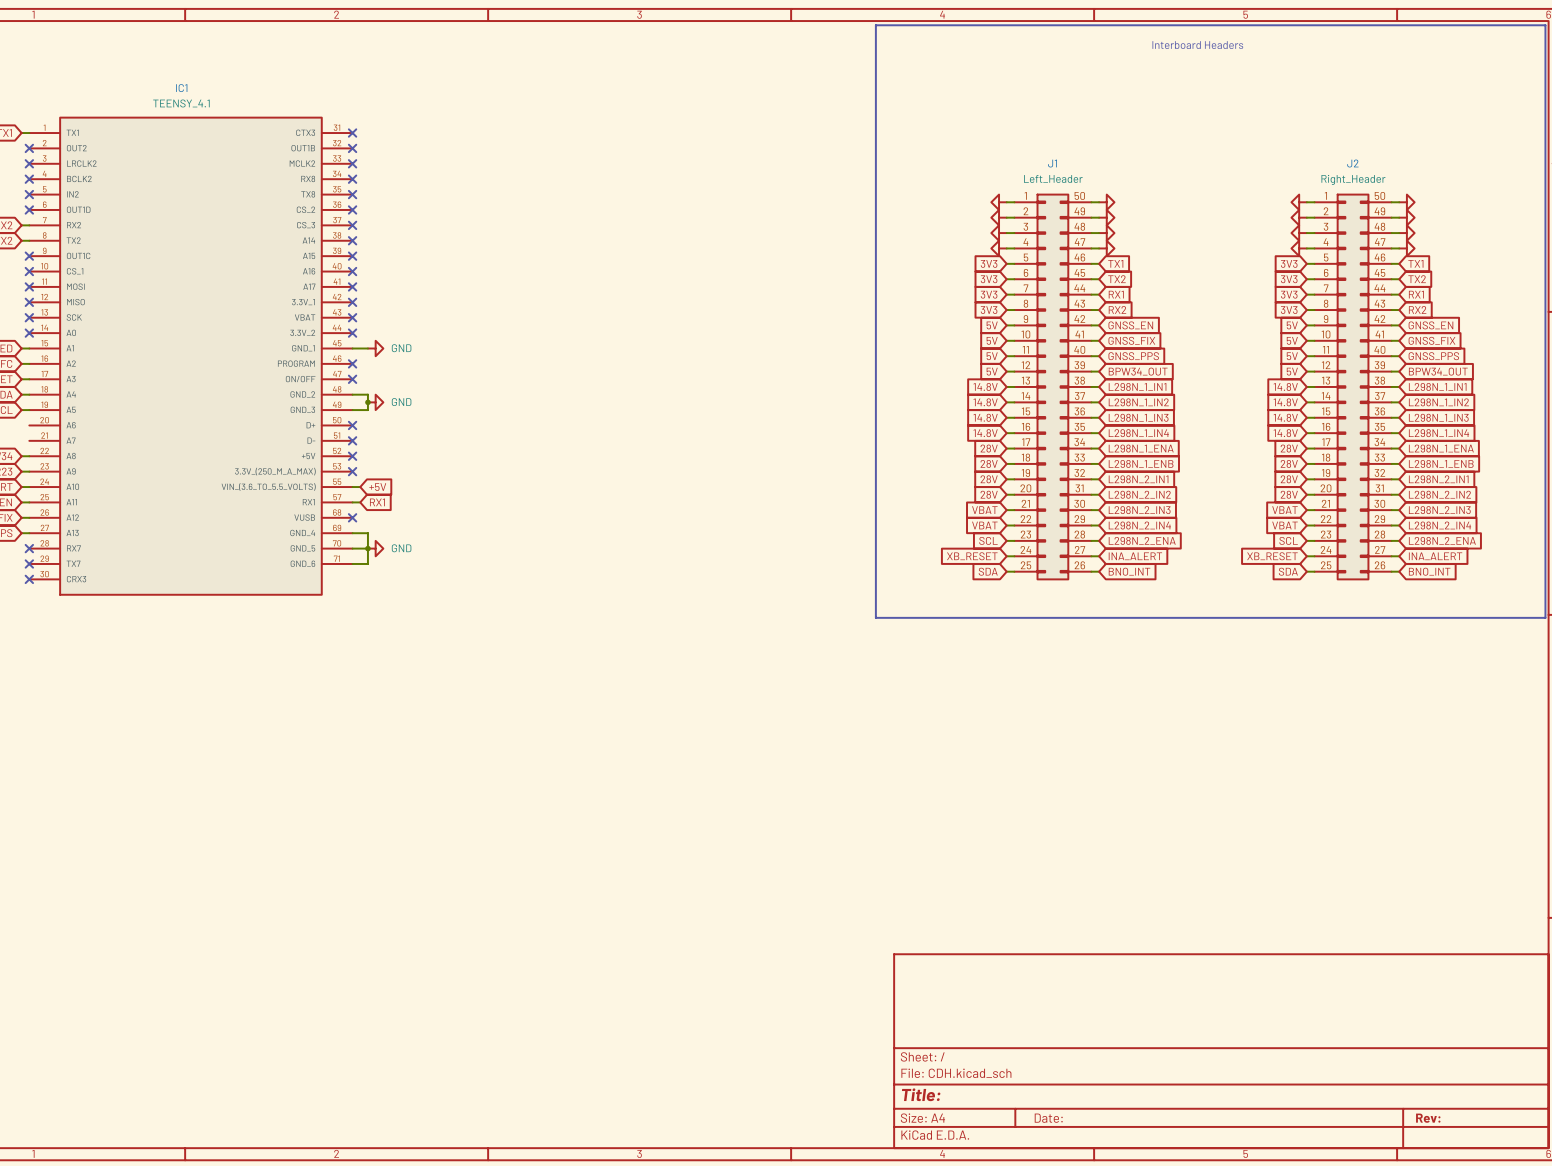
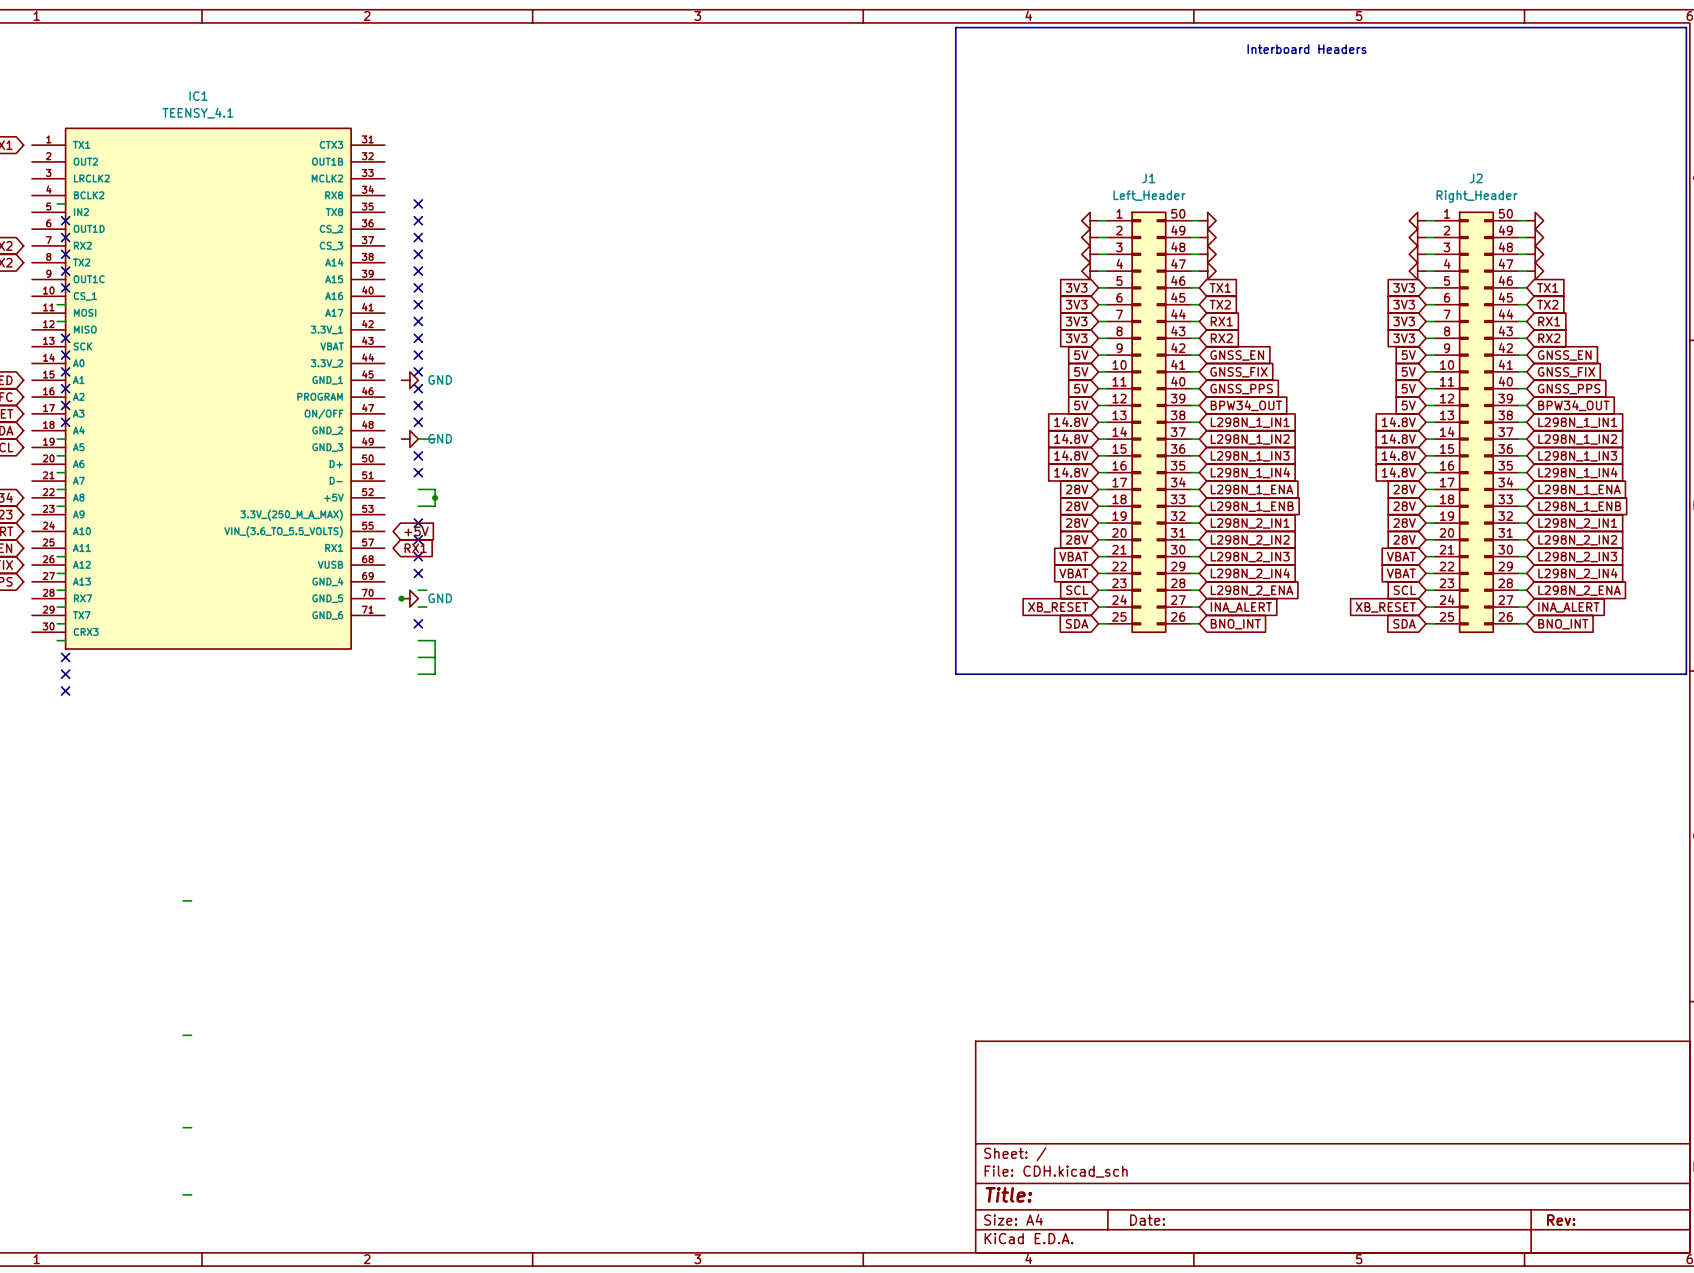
wire: (21, 133) (29, 133) -> (57, 203) (65, 203)
no-connect mark: (352, 133) -> none
no-connect mark: (29, 148) -> none
no-connect mark: (352, 148) -> none
no-connect mark: (29, 163) -> none
no-connect mark: (352, 163) -> none
no-connect mark: (29, 179) -> none
no-connect mark: (352, 179) -> none
no-connect mark: none -> (418, 203)
no-connect mark: (29, 194) -> none
no-connect mark: (352, 194) -> none
no-connect mark: none -> (65, 220)
no-connect mark: none -> (418, 220)
no-connect mark: (29, 209) -> none
no-connect mark: (352, 209) -> none
no-connect mark: none -> (65, 237)
no-connect mark: none -> (418, 237)
wire: (21, 225) (29, 225) -> (57, 304) (65, 304)
no-connect mark: (352, 225) -> none
no-connect mark: none -> (65, 254)
no-connect mark: none -> (418, 254)
wire: (21, 240) (29, 240) -> (57, 321) (65, 321)
no-connect mark: (352, 240) -> none
no-connect mark: none -> (65, 271)
no-connect mark: none -> (418, 271)
no-connect mark: (29, 256) -> none
no-connect mark: (352, 256) -> none
no-connect mark: none -> (65, 287)
no-connect mark: none -> (418, 287)
no-connect mark: (29, 271) -> none
no-connect mark: (352, 271) -> none
no-connect mark: none -> (418, 304)
no-connect mark: (29, 286) -> none
no-connect mark: (352, 286) -> none
no-connect mark: none -> (418, 321)
no-connect mark: (29, 302) -> none
no-connect mark: (352, 302) -> none
no-connect mark: none -> (65, 338)
no-connect mark: none -> (418, 338)
no-connect mark: (29, 317) -> none
no-connect mark: (352, 317) -> none
no-connect mark: none -> (65, 355)
no-connect mark: none -> (418, 355)
no-connect mark: (29, 333) -> none
no-connect mark: (352, 333) -> none
no-connect mark: none -> (65, 371)
no-connect mark: none -> (418, 371)
wire: (21, 348) (29, 348) -> (57, 439) (65, 439)
wire: (352, 348) (367, 348) -> (418, 439) (435, 439)
no-connect mark: none -> (65, 388)
no-connect mark: none -> (418, 388)
wire: (21, 363) (29, 363) -> (57, 455) (65, 455)
no-connect mark: (352, 363) -> none
no-connect mark: none -> (65, 405)
no-connect mark: none -> (418, 405)
wire: (21, 379) (29, 379) -> (57, 472) (65, 472)
no-connect mark: (352, 379) -> none
no-connect mark: none -> (65, 422)
no-connect mark: none -> (418, 422)
wire: (21, 394) (29, 394) -> (57, 489) (65, 489)
wire: (352, 394) (367, 394) (367, 410) (352, 410) -> (418, 489) (435, 489) (435, 506) (418, 506)
junction: (367, 402) -> none
wire: (21, 410) (29, 410) -> (57, 506) (65, 506)
no-connect mark: none -> (418, 455)
no-connect mark: (352, 425) -> none
no-connect mark: none -> (418, 472)
no-connect mark: (352, 440) -> none
wire: (21, 456) (29, 456) -> (57, 556) (65, 556)
no-connect mark: (352, 456) -> none
junction: none -> (435, 497)
wire: (21, 471) (29, 471) -> (57, 573) (65, 573)
no-connect mark: (352, 471) -> none
no-connect mark: none -> (418, 523)
wire: (21, 487) (29, 487) -> (57, 590) (65, 590)
wire: (352, 487) (360, 487) -> (418, 590) (426, 590)
no-connect mark: none -> (418, 539)
wire: (21, 502) (29, 502) -> (57, 607) (65, 607)
wire: (352, 502) (360, 502) -> (418, 607) (426, 607)
no-connect mark: none -> (418, 556)
wire: (21, 517) (29, 517) -> (57, 623) (65, 623)
no-connect mark: (352, 517) -> none
no-connect mark: none -> (418, 573)
wire: (21, 533) (29, 533) -> (57, 640) (65, 640)
wire: (352, 533) (367, 533) (367, 563) (352, 563) -> (418, 640) (435, 640) (435, 674) (418, 674)
no-connect mark: (29, 548) -> none
wire: (352, 548) (367, 548) -> (418, 657) (435, 657)
no-connect mark: (29, 563) -> none
no-connect mark: none -> (418, 623)
no-connect mark: (29, 579) -> none
no-connect mark: none -> (65, 657)
no-connect mark: none -> (65, 674)
no-connect mark: none -> (65, 691)
wire: none -> (183, 900) (191, 900)
wire: none -> (183, 1035) (191, 1035)
wire: none -> (183, 1127) (191, 1127)
wire: none -> (183, 1194) (191, 1194)

